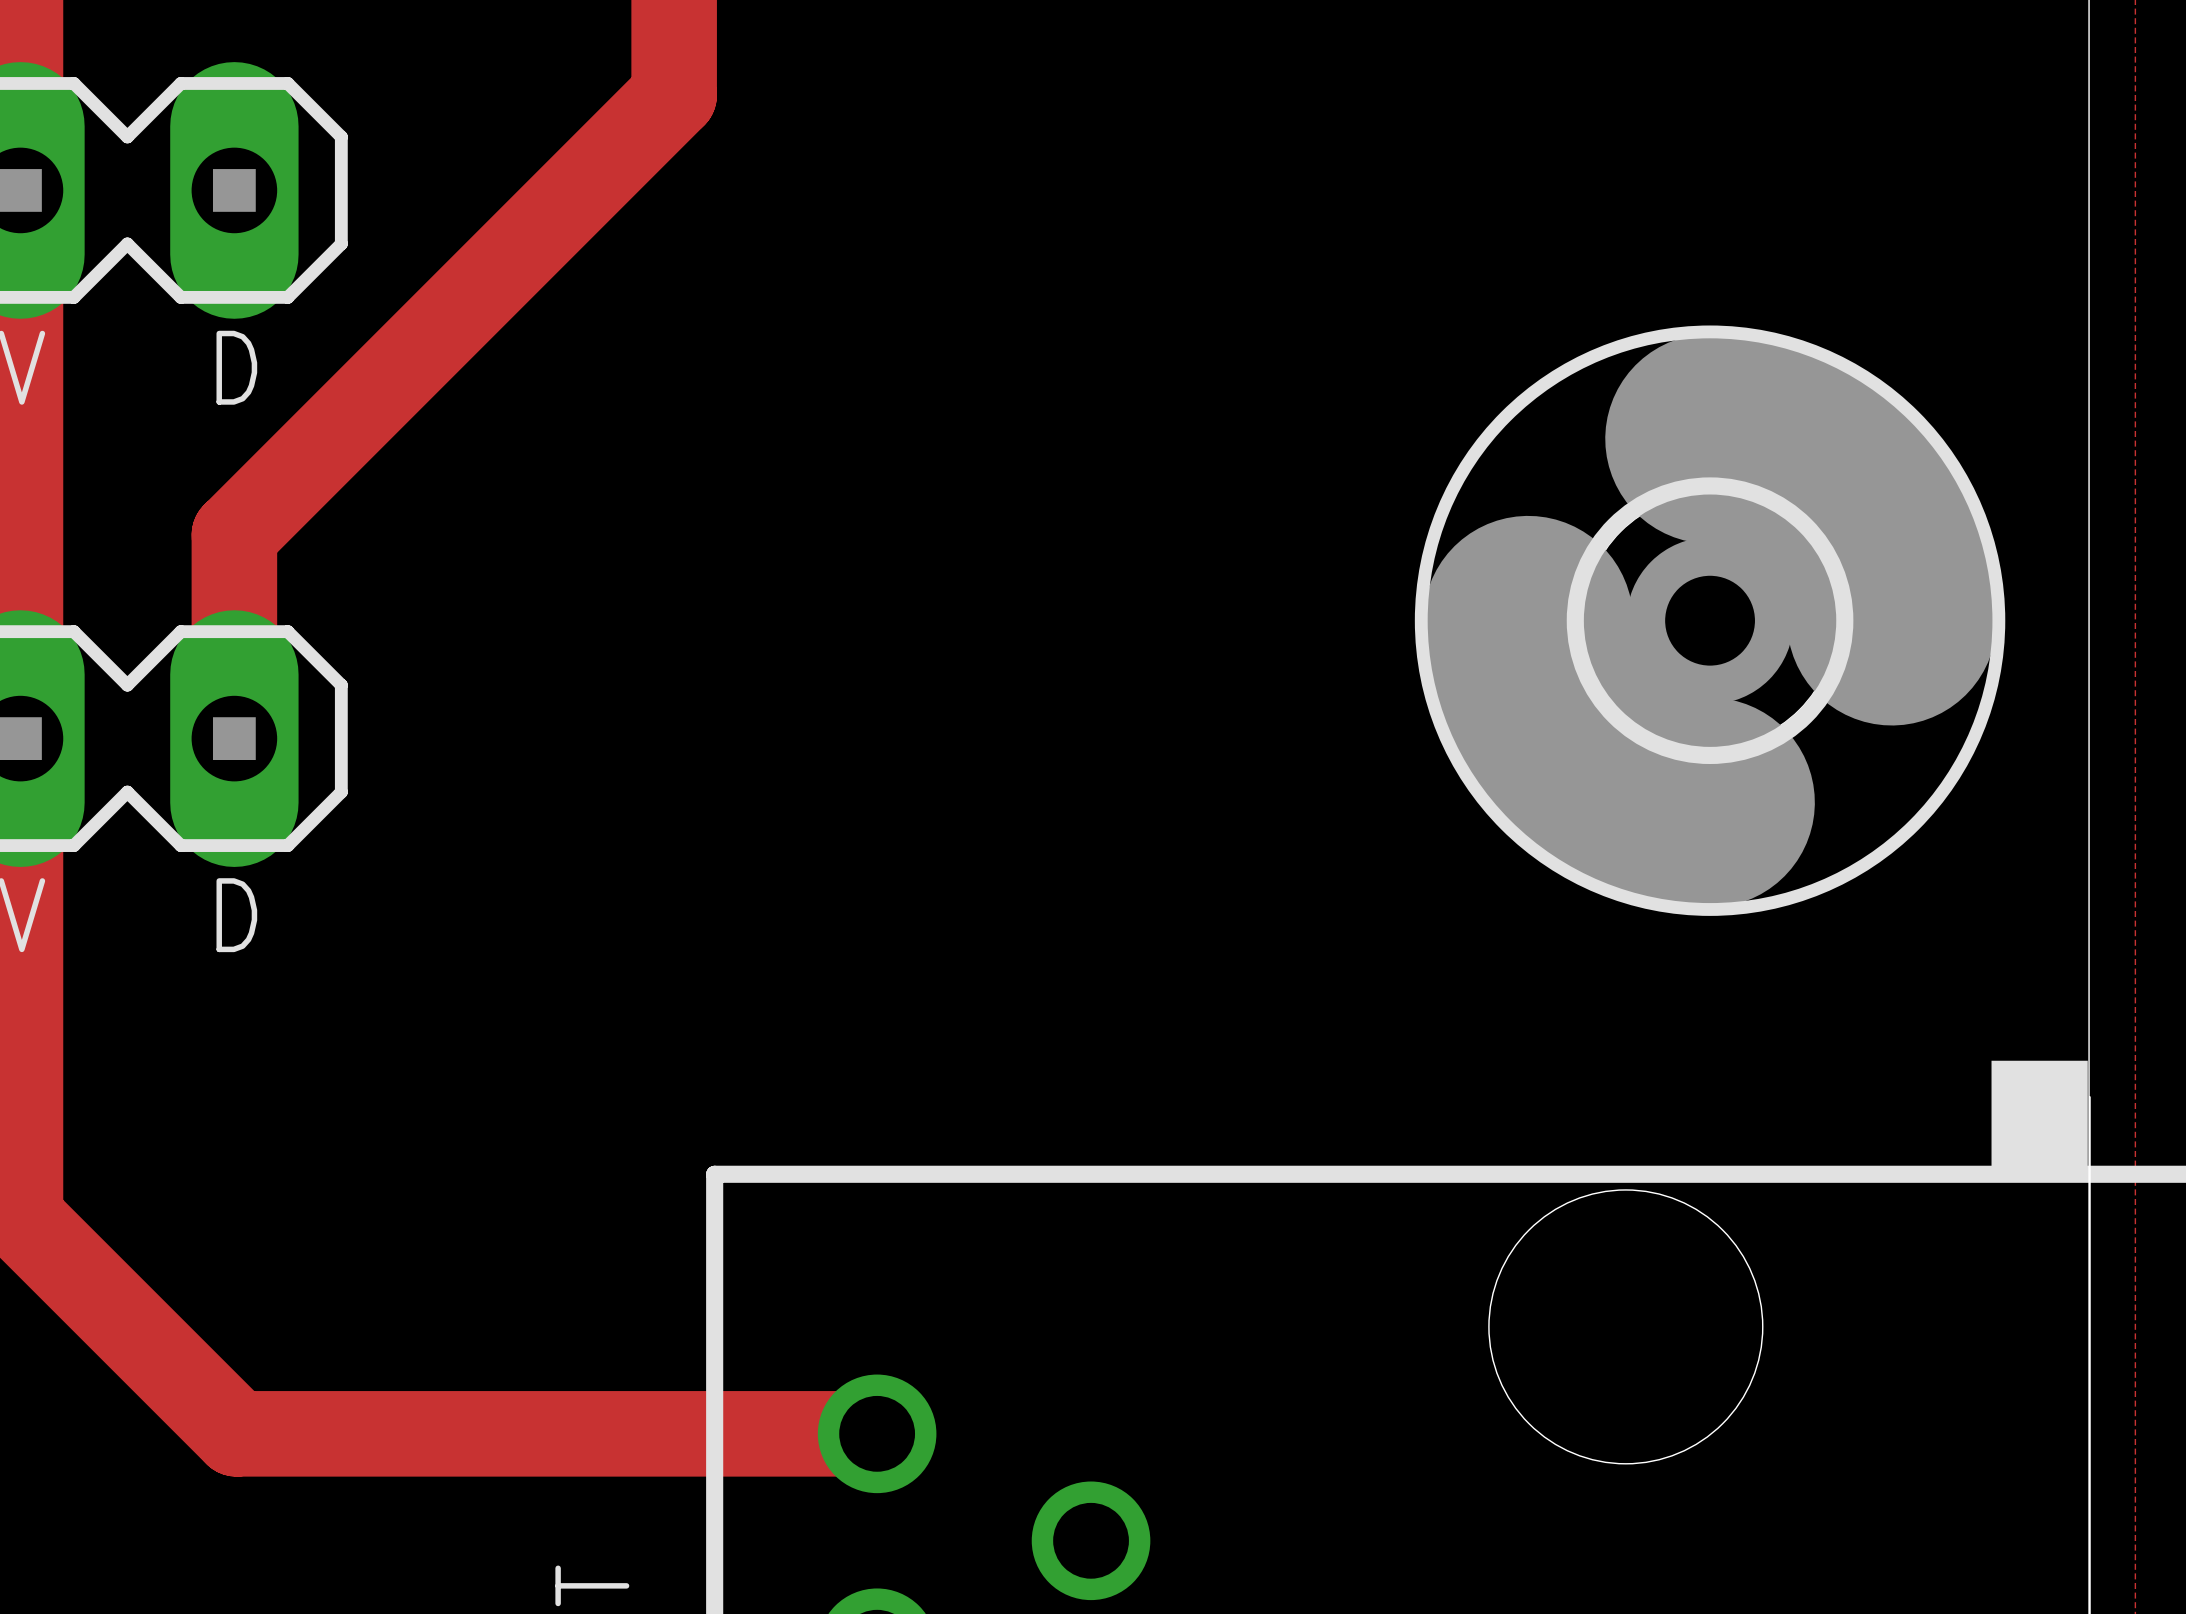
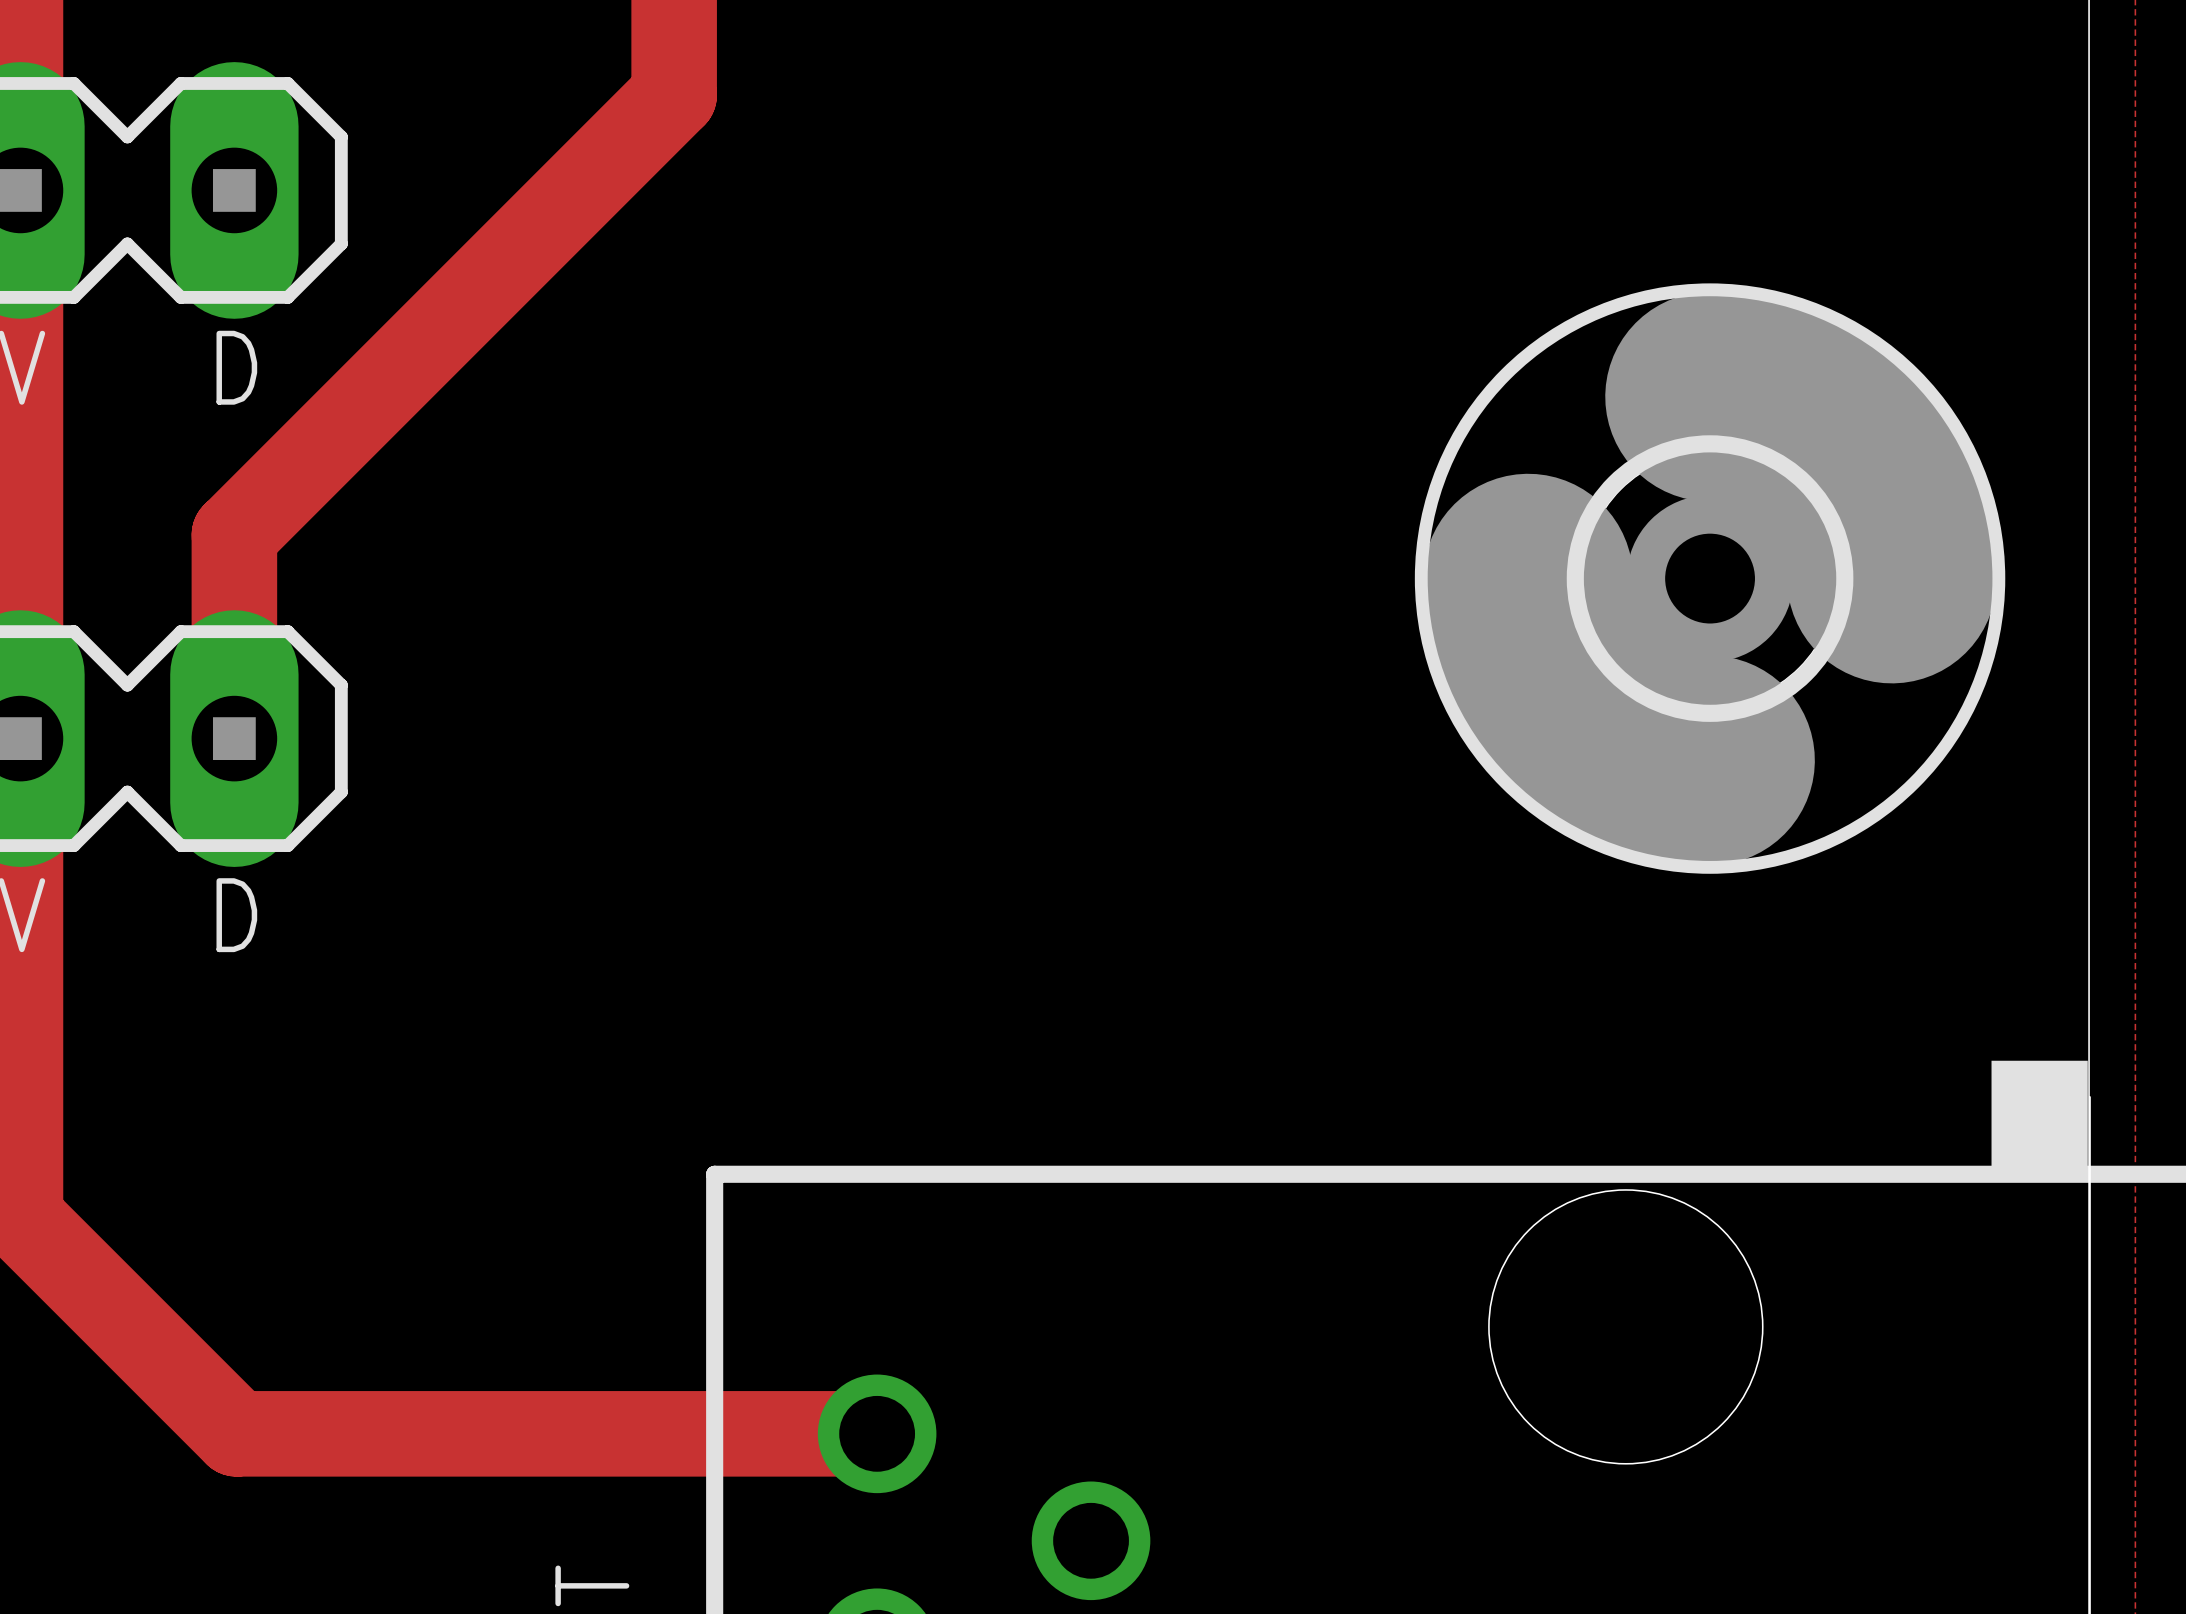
part position: (1710, 620) -> (1710, 578)

